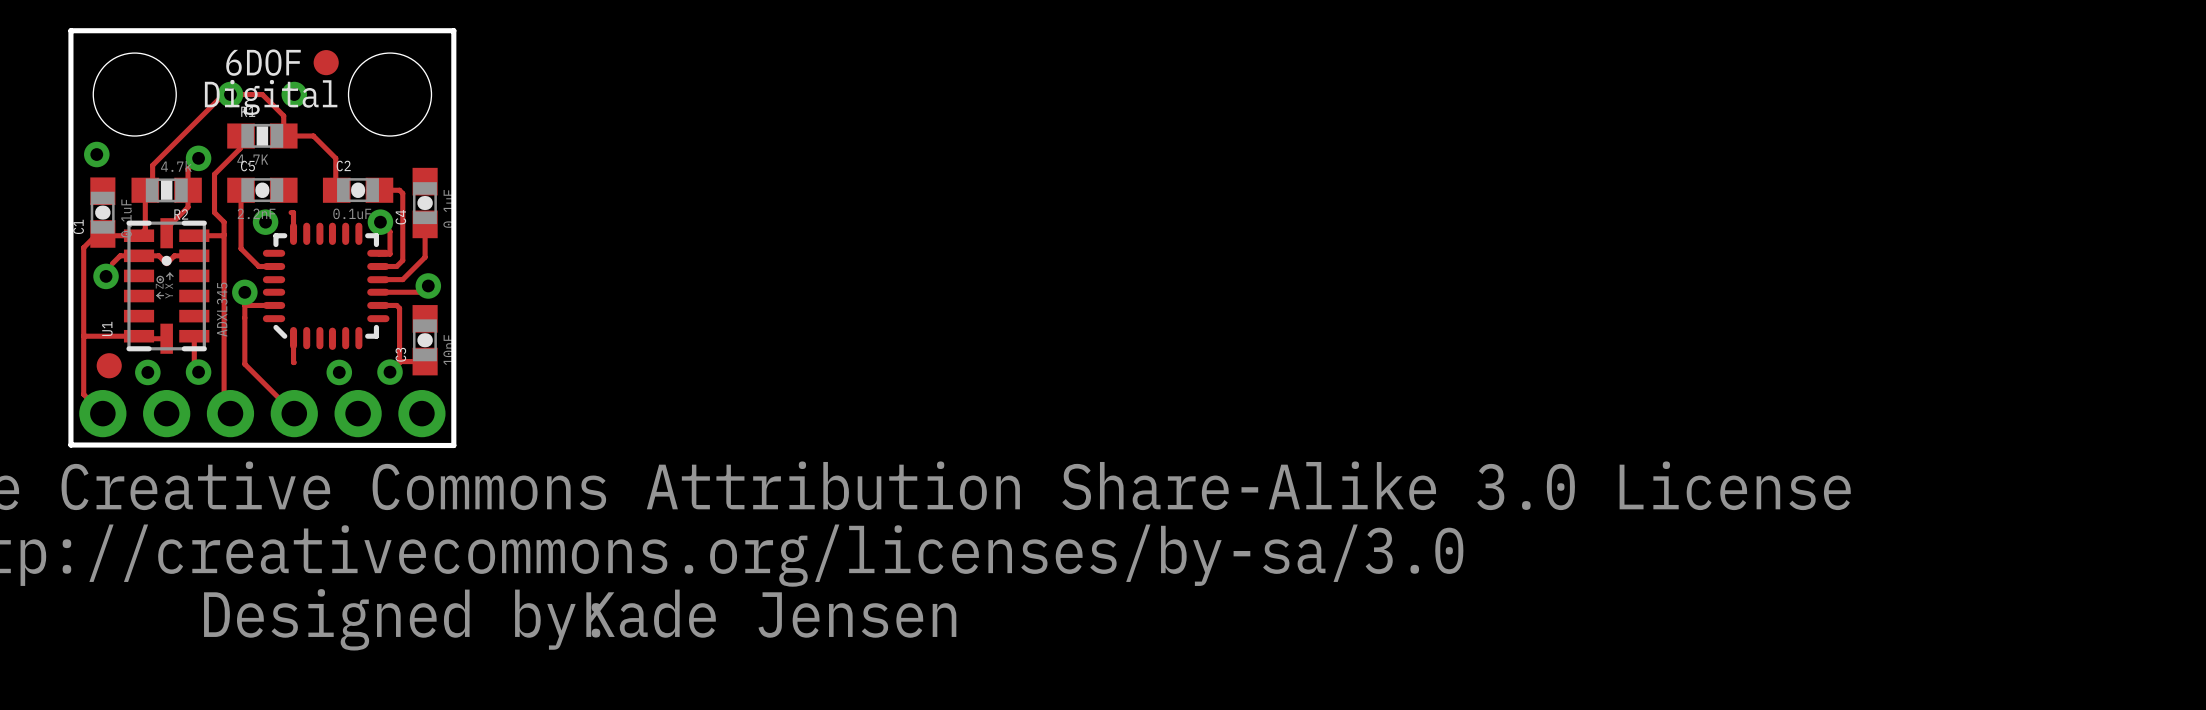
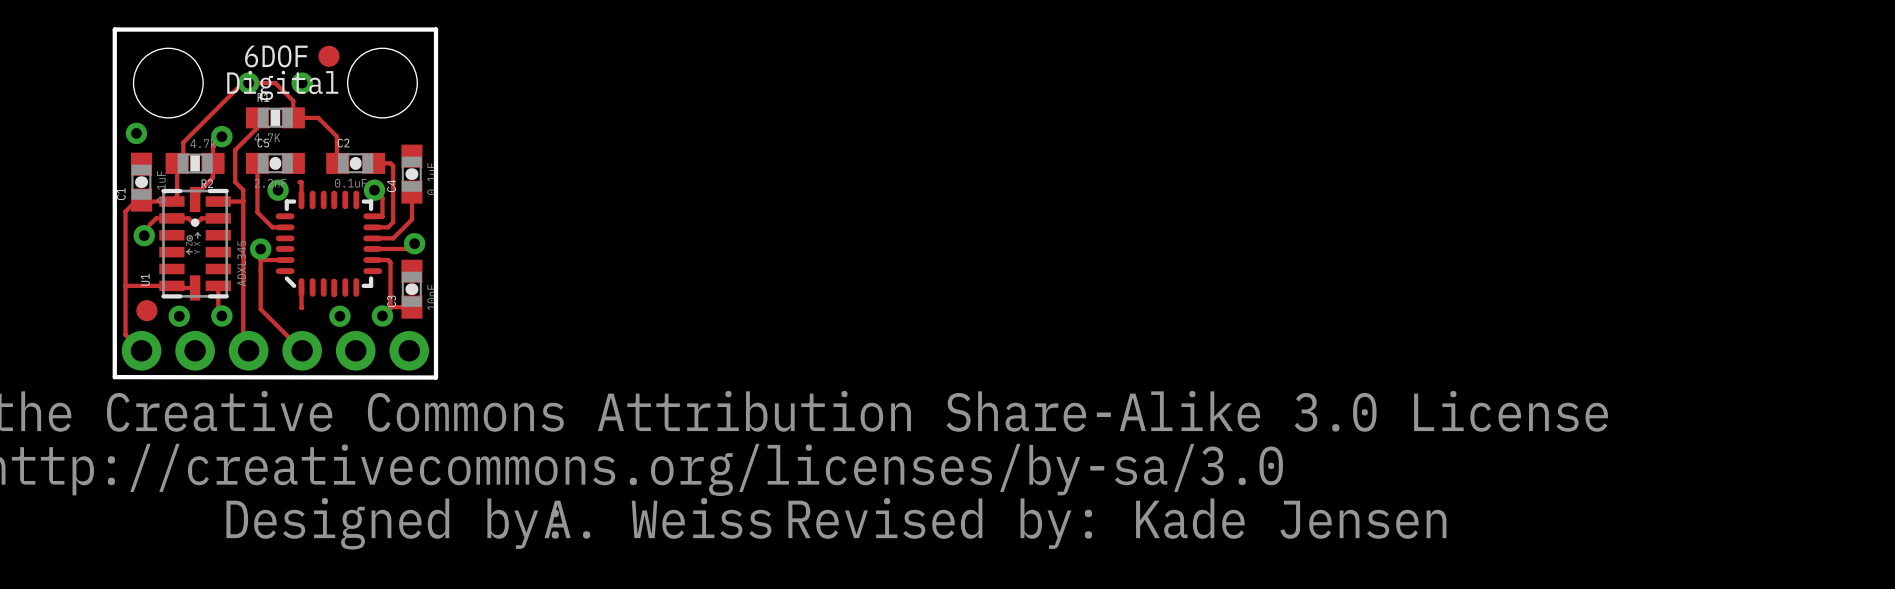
text: Kade Jensen (771, 613) -> A. Weiss (657, 518)
text: none -> Revised by: Kade Jensen (1117, 523)

